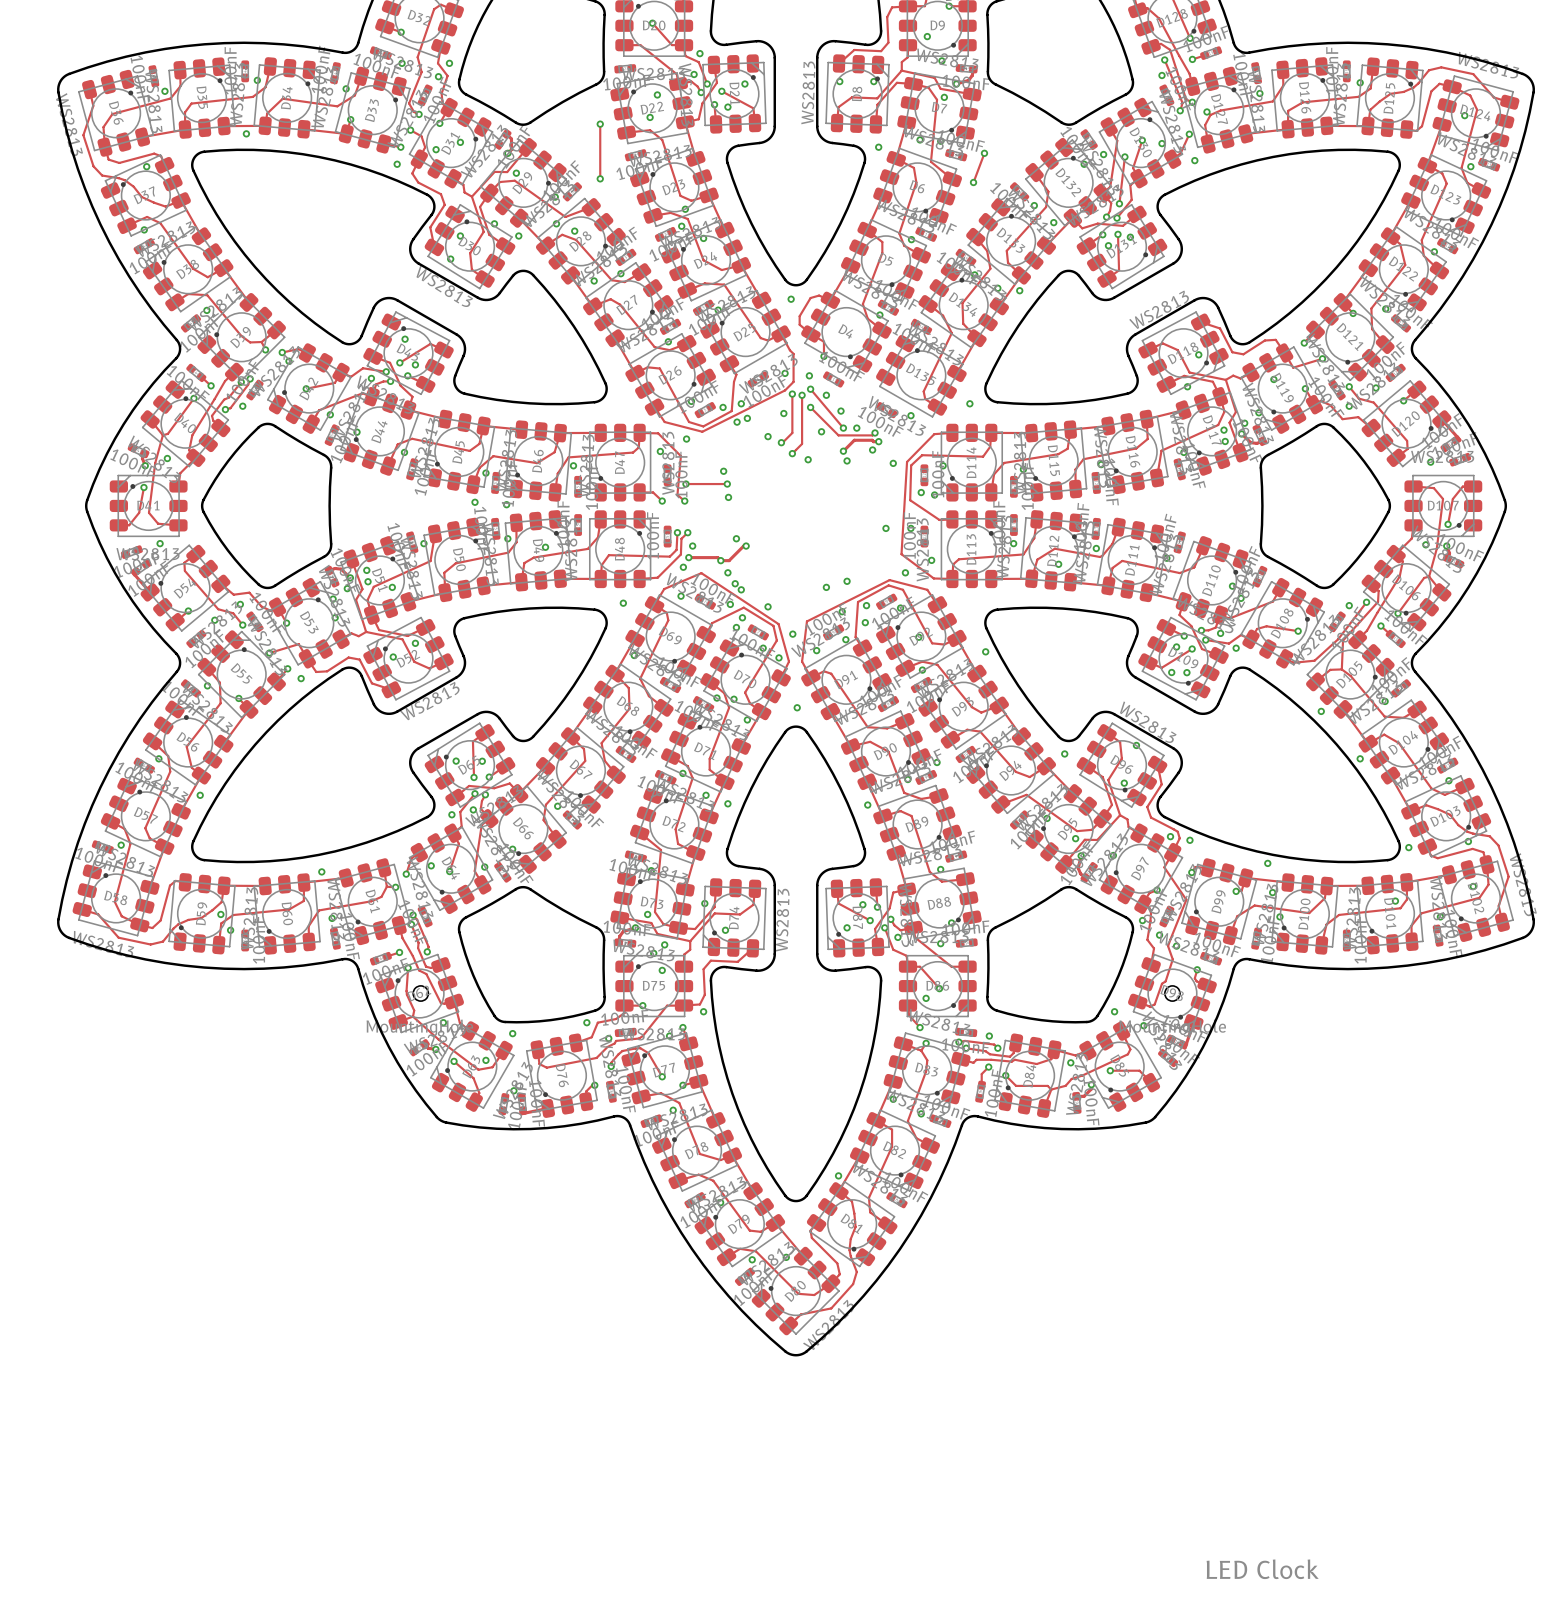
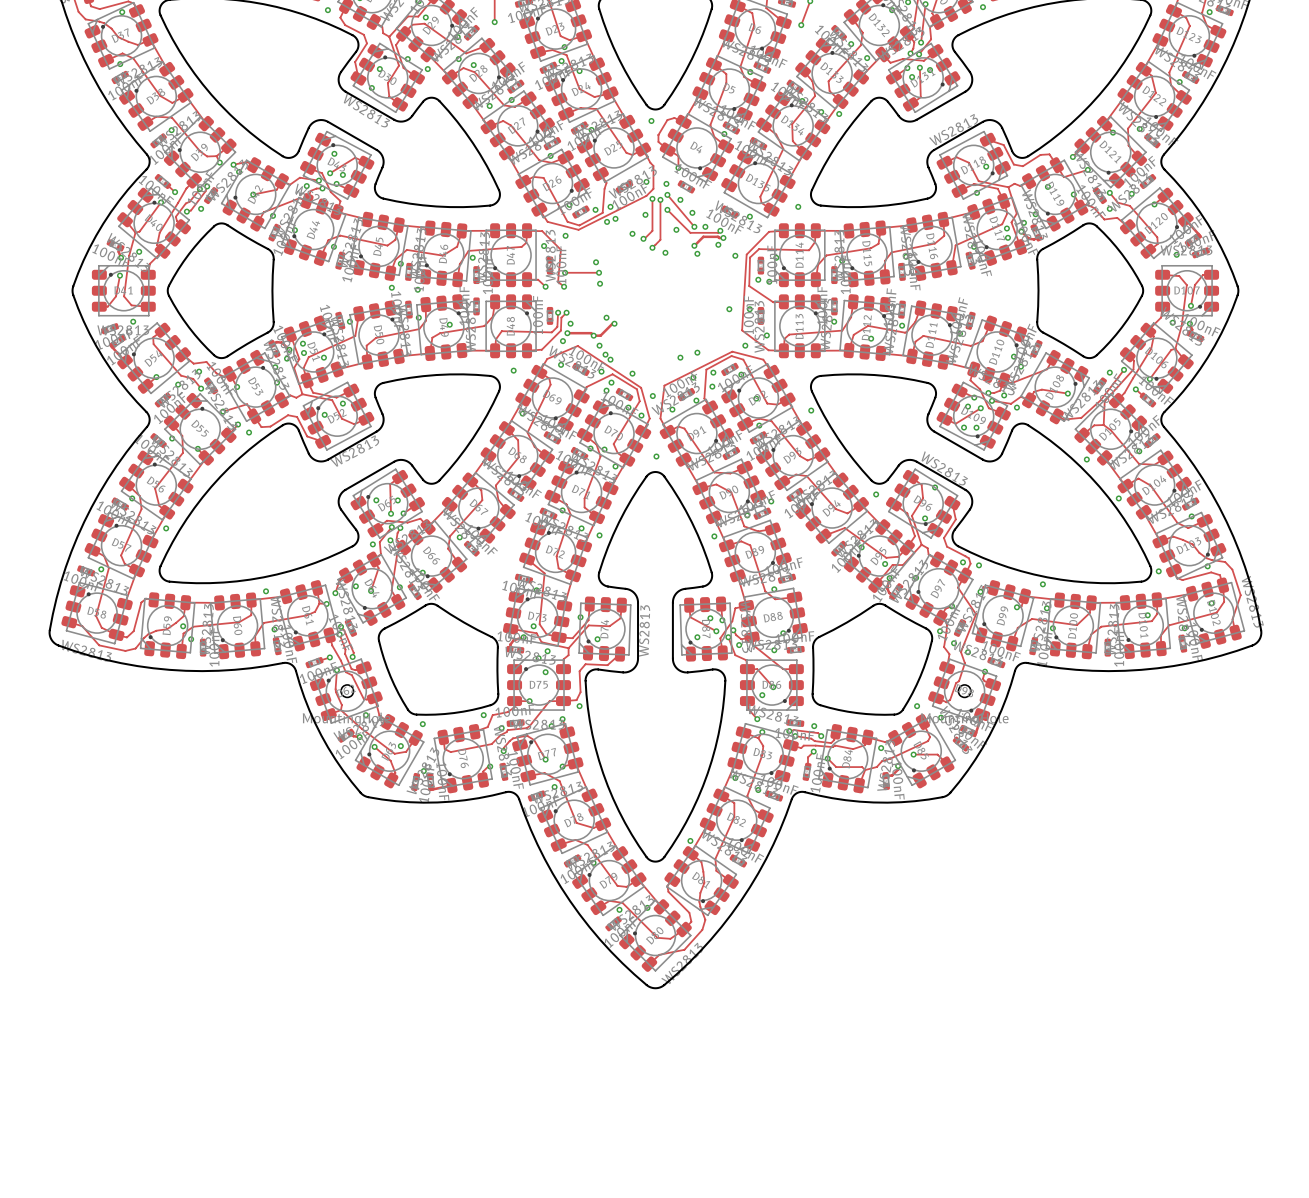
text: LED Clock (1262, 1569) -> none

